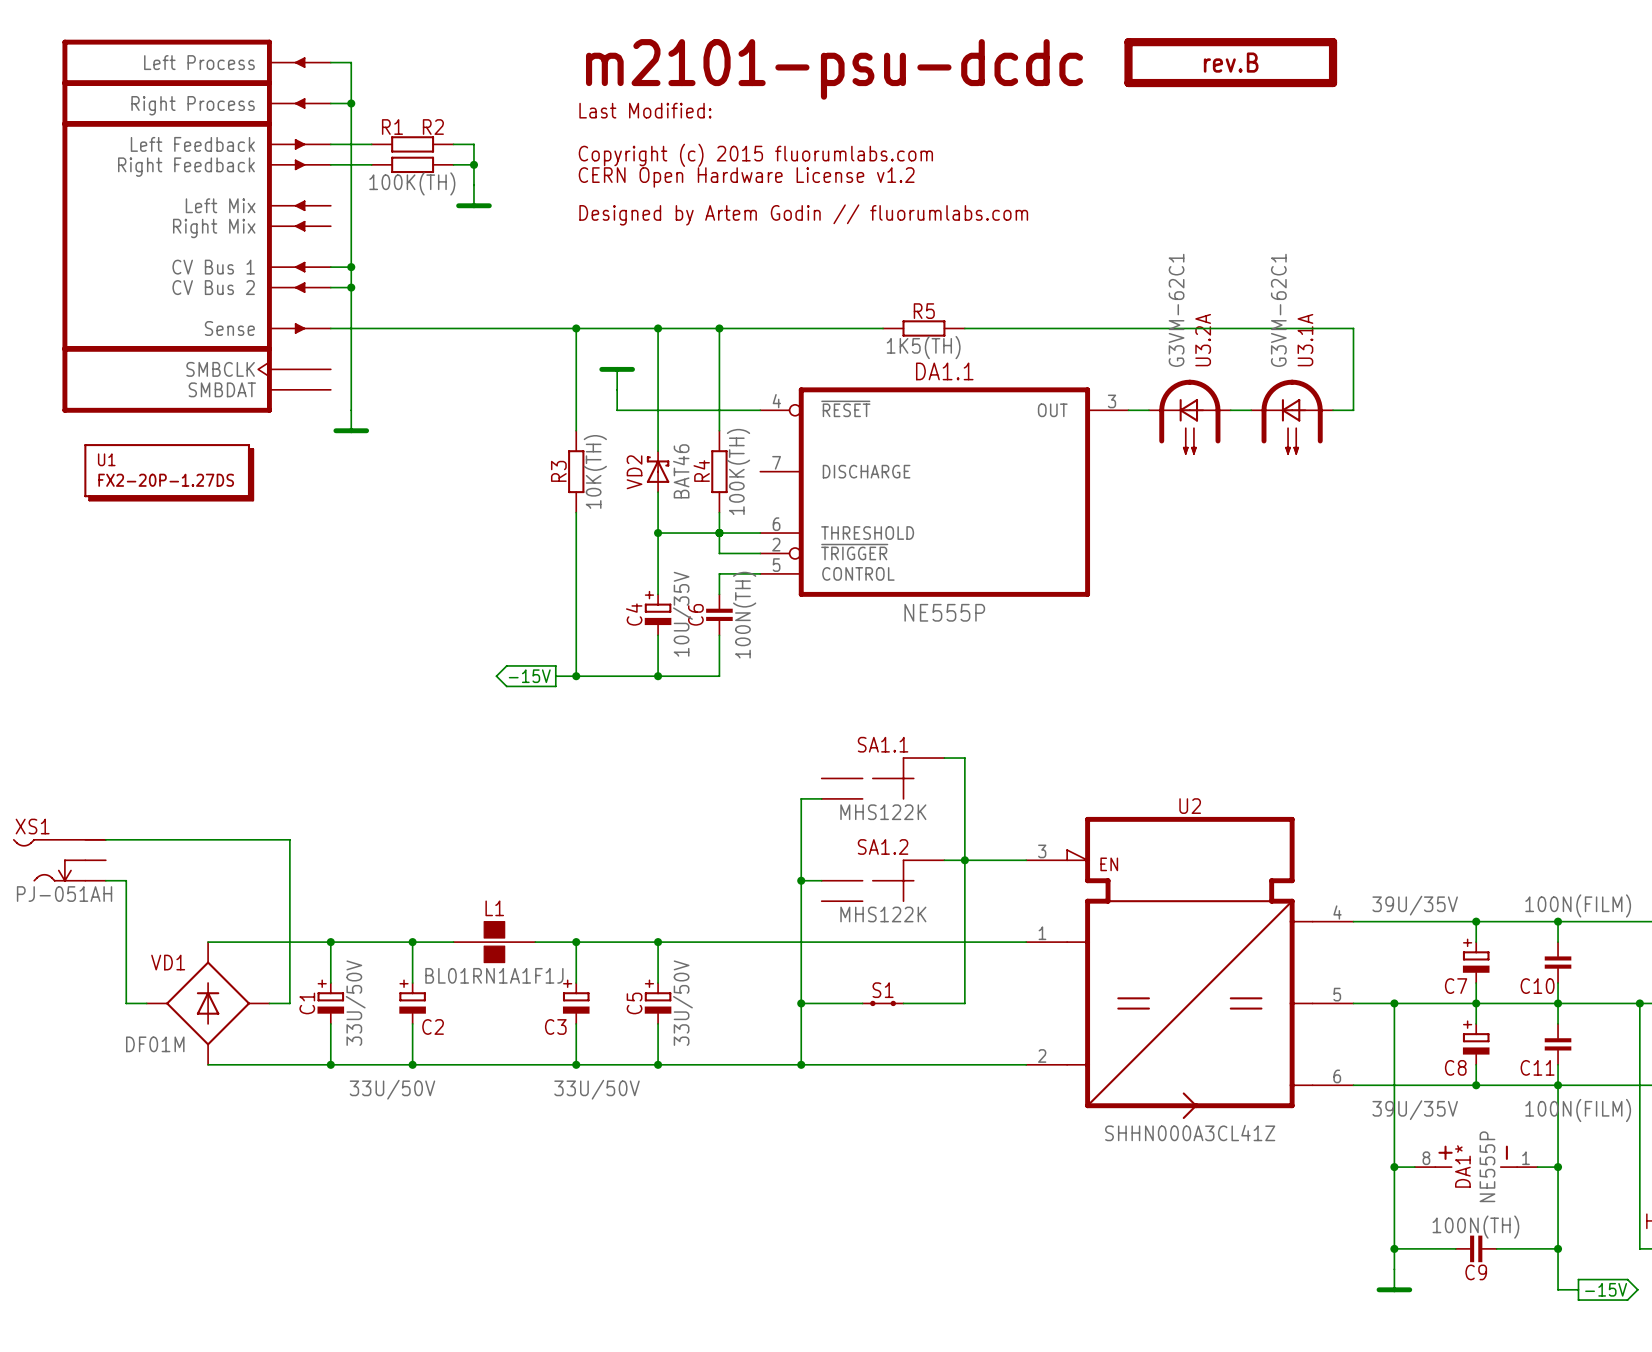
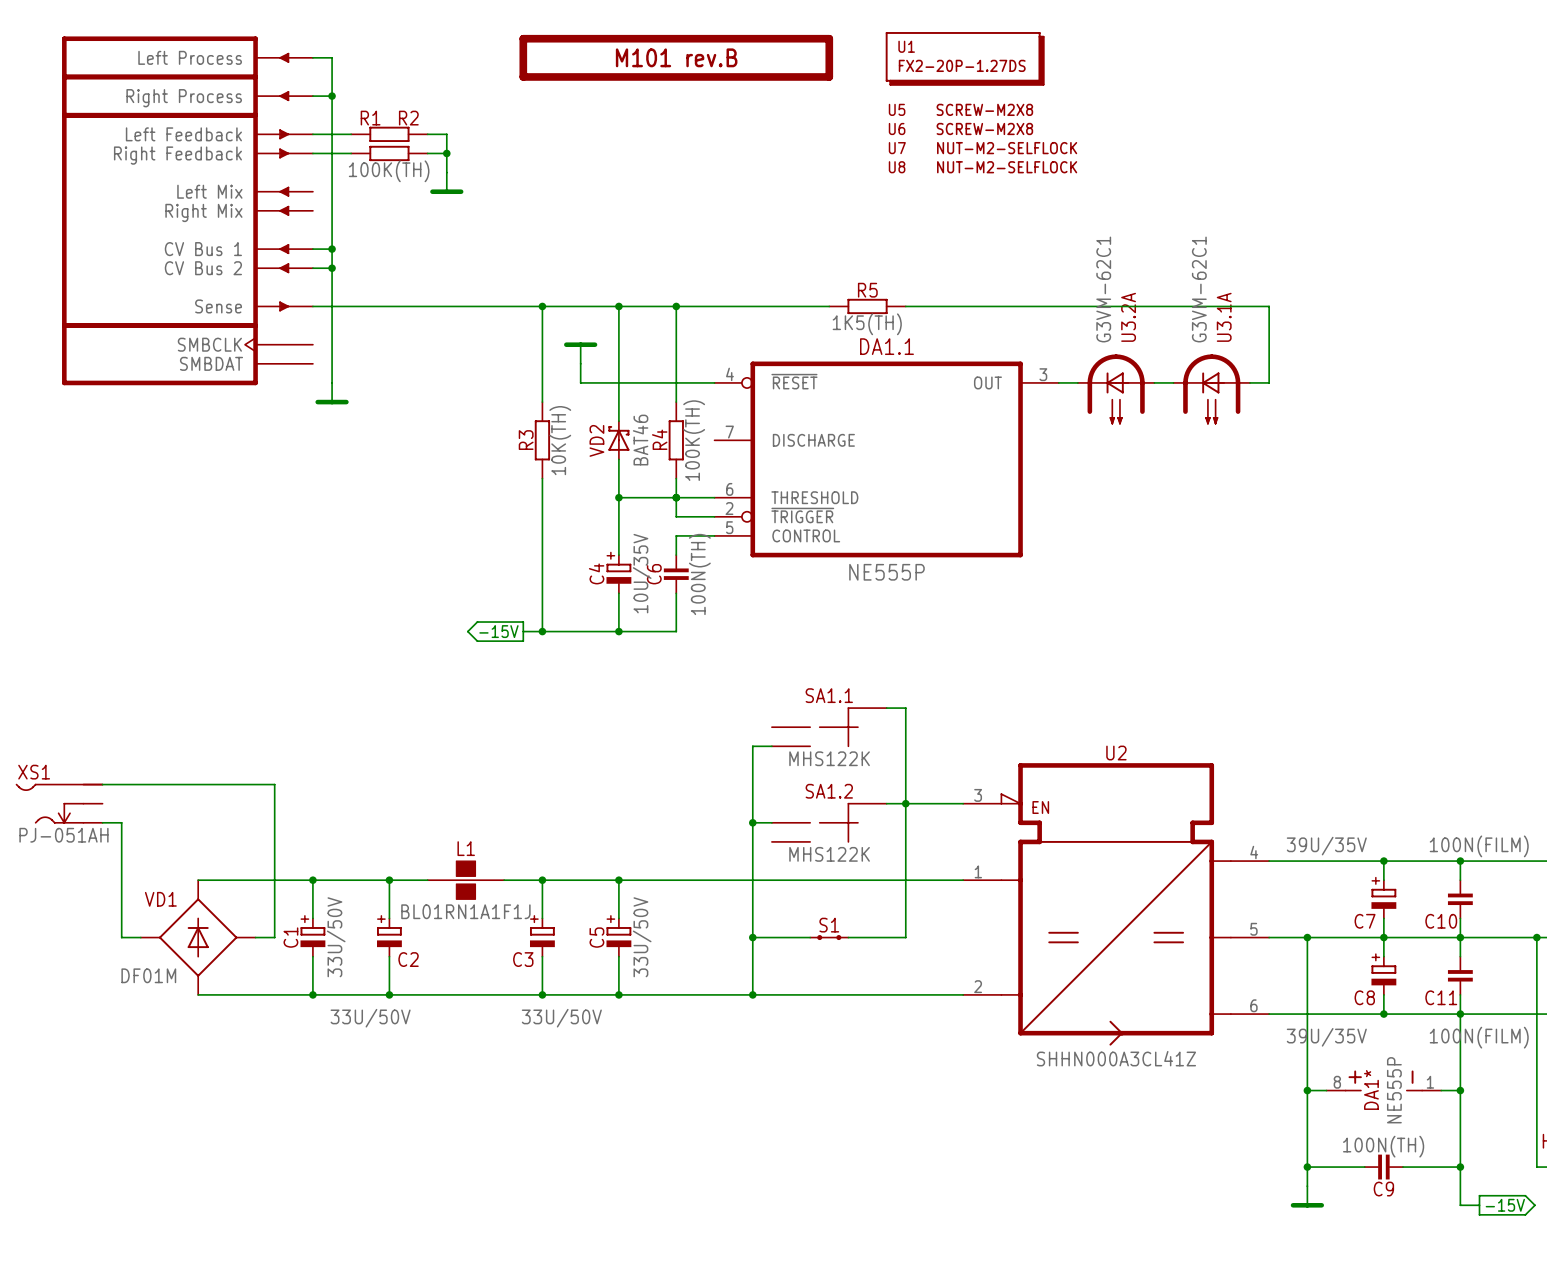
part: none -> M101 rev.B (676, 57)
part: rev.B (1230, 62) -> none
U5: none -> SCREW-M2X8 (961, 109)
part: Designed by Artem Godin // fluorumlabs.com (830, 132) -> none
U6: none -> SCREW-M2X8 (961, 128)
U7: none -> NUT-M2-SELFLOCK (983, 148)
U8: none -> NUT-M2-SELFLOCK (983, 167)
U1 position: (169, 472) -> (965, 58)

